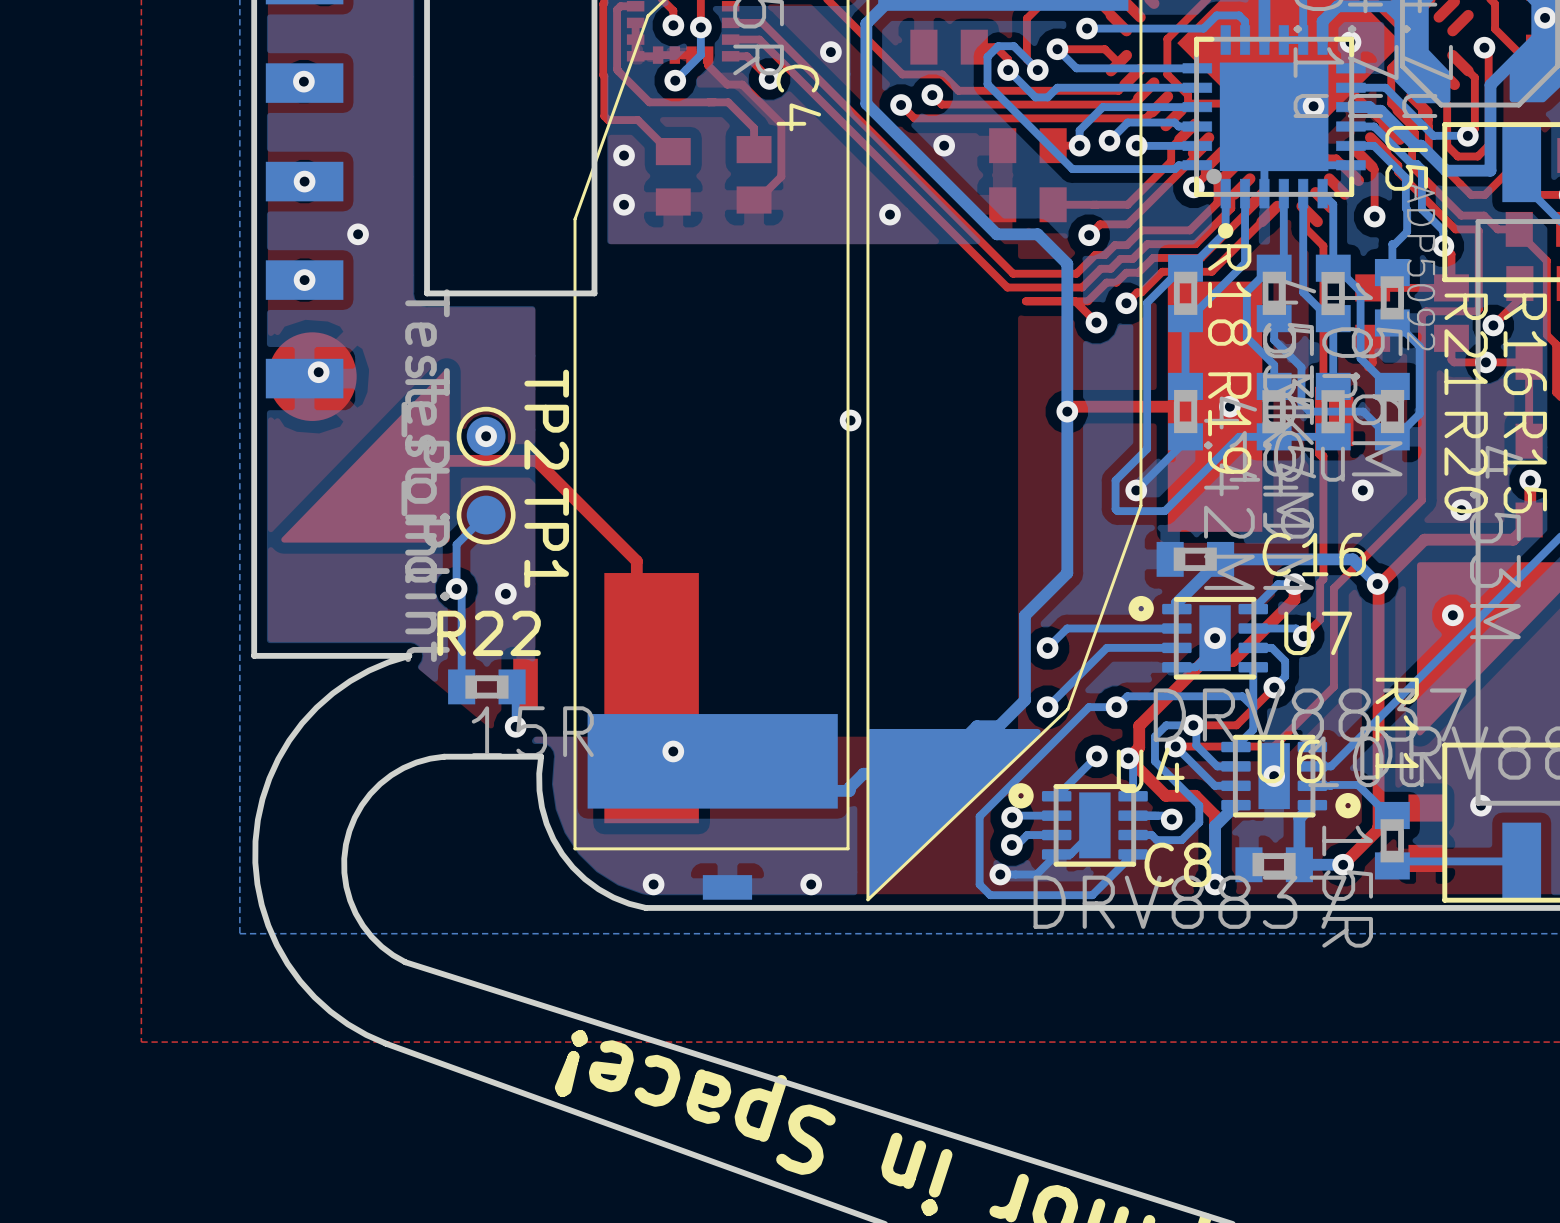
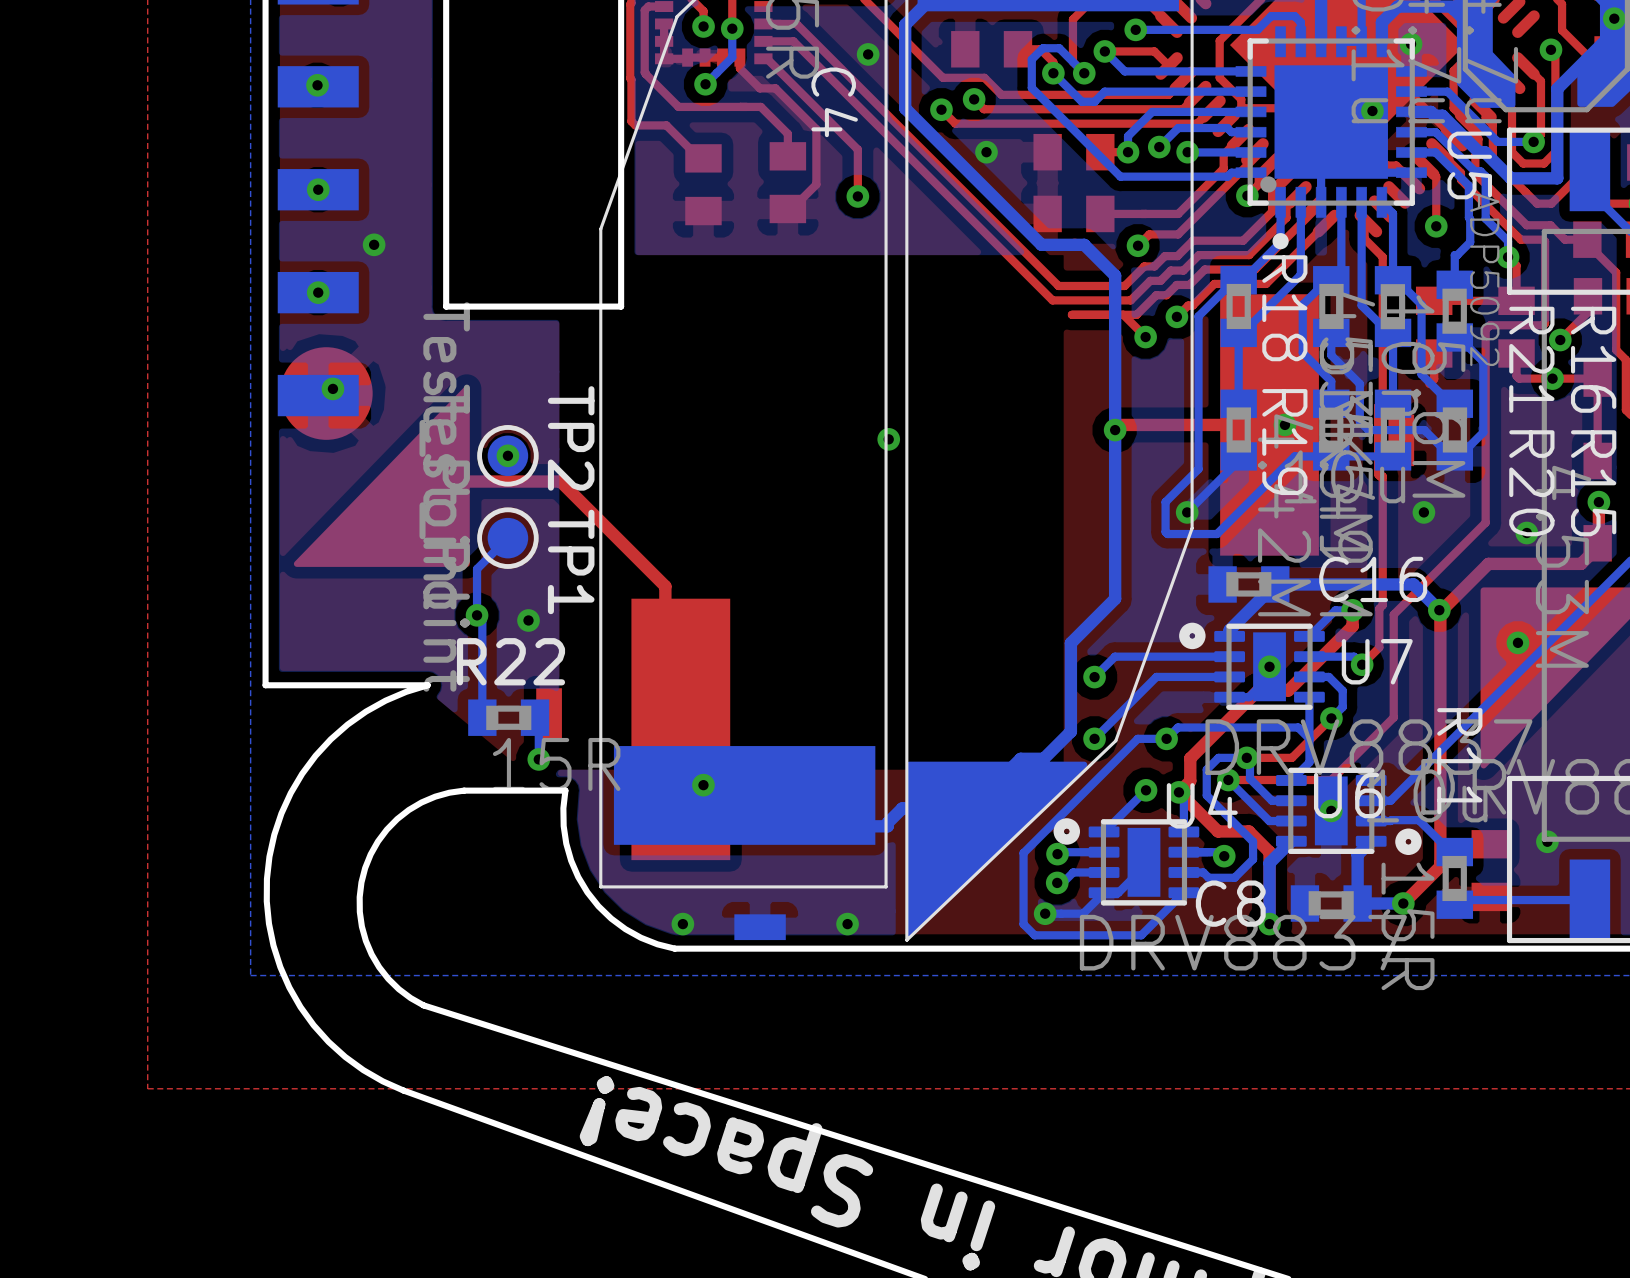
top track: (734, 56) (746, 56) (769, 78) -> (767, 58) (857, 149) (857, 196)
via: (769, 78) -> none
via: (624, 155) -> none
via: none -> (857, 196)
via: (624, 204) -> none
via: (890, 214) -> none

